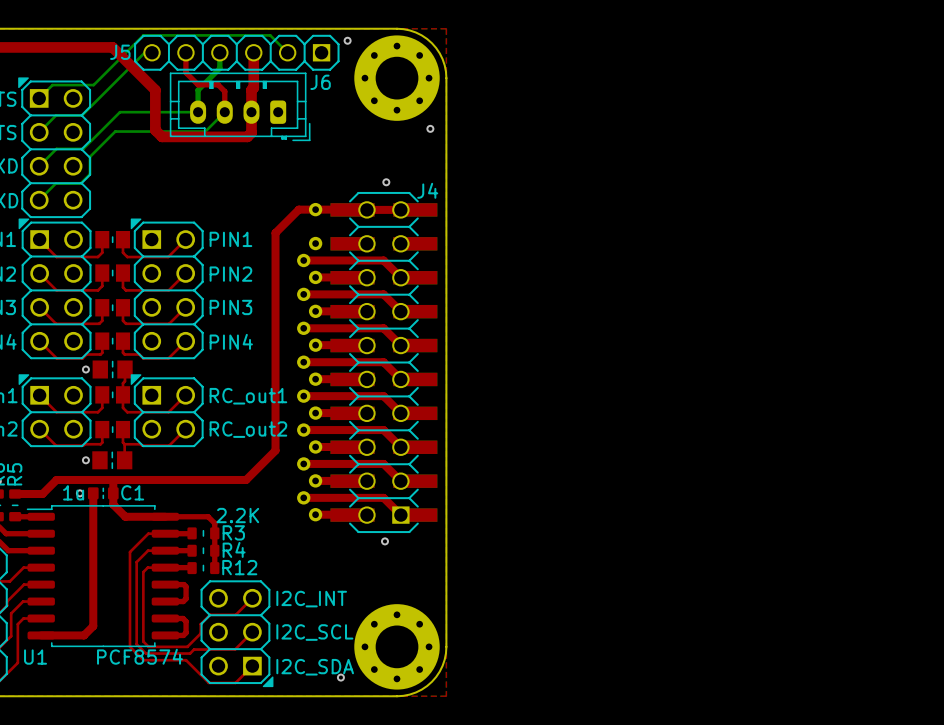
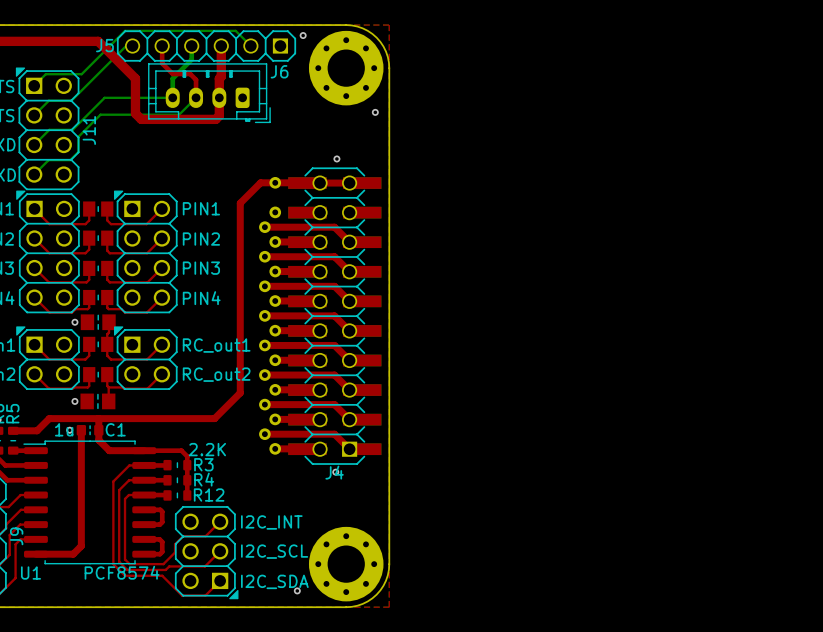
J11 name: none -> J11 (89, 130)
J4 name position: J4 (427, 190) -> J4 (334, 472)
J9 name: none -> J9 (16, 536)

